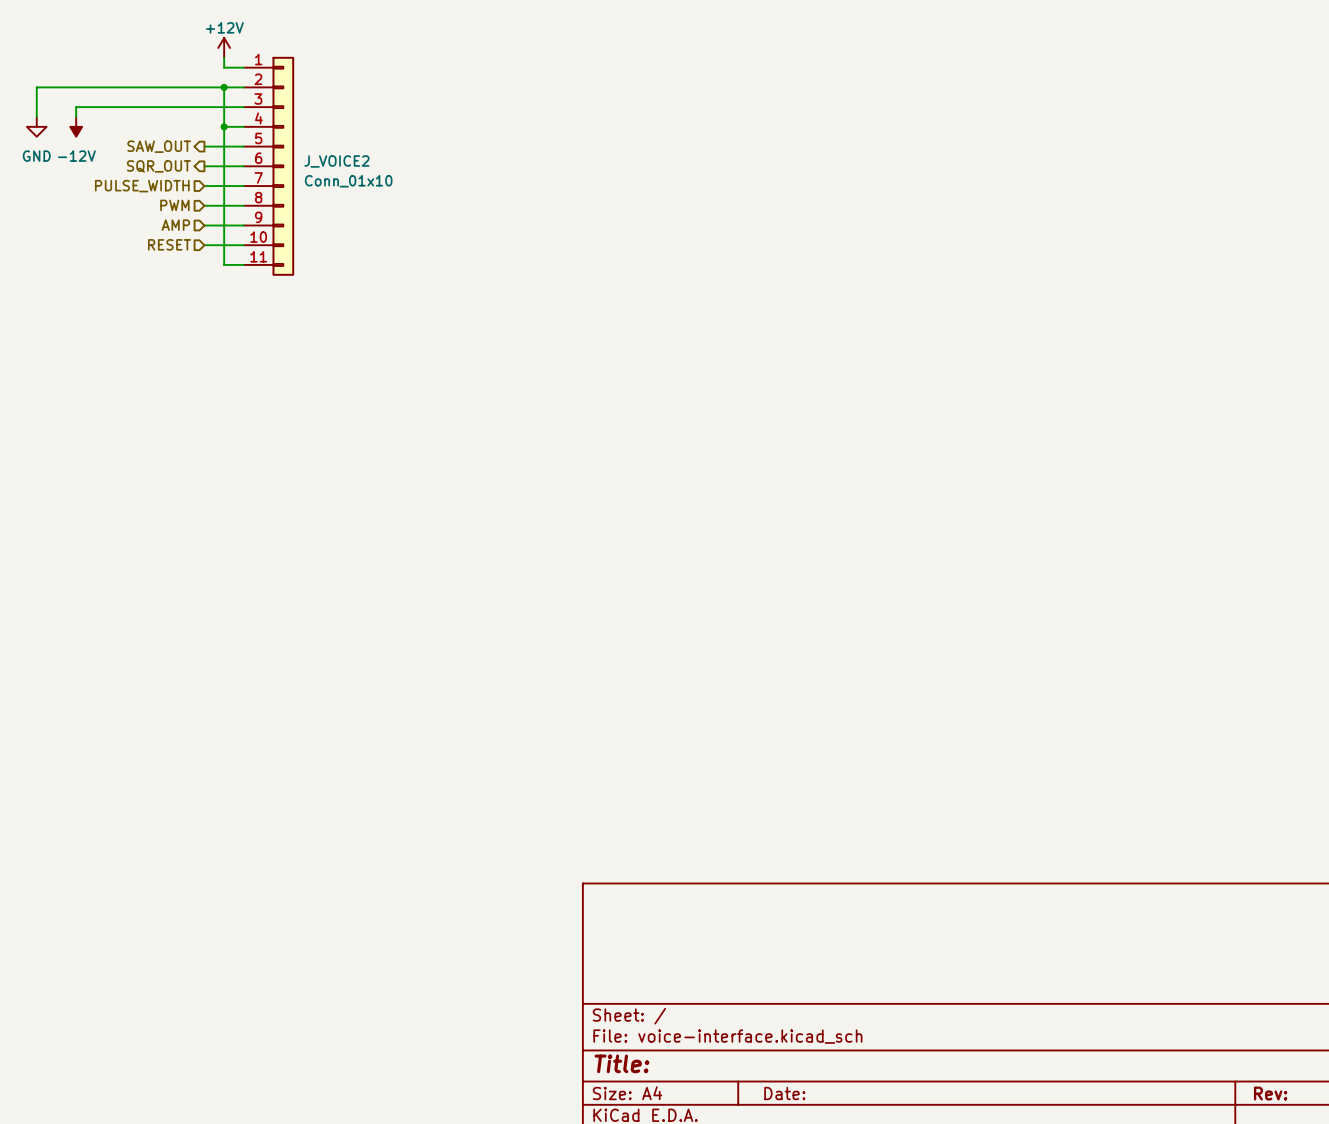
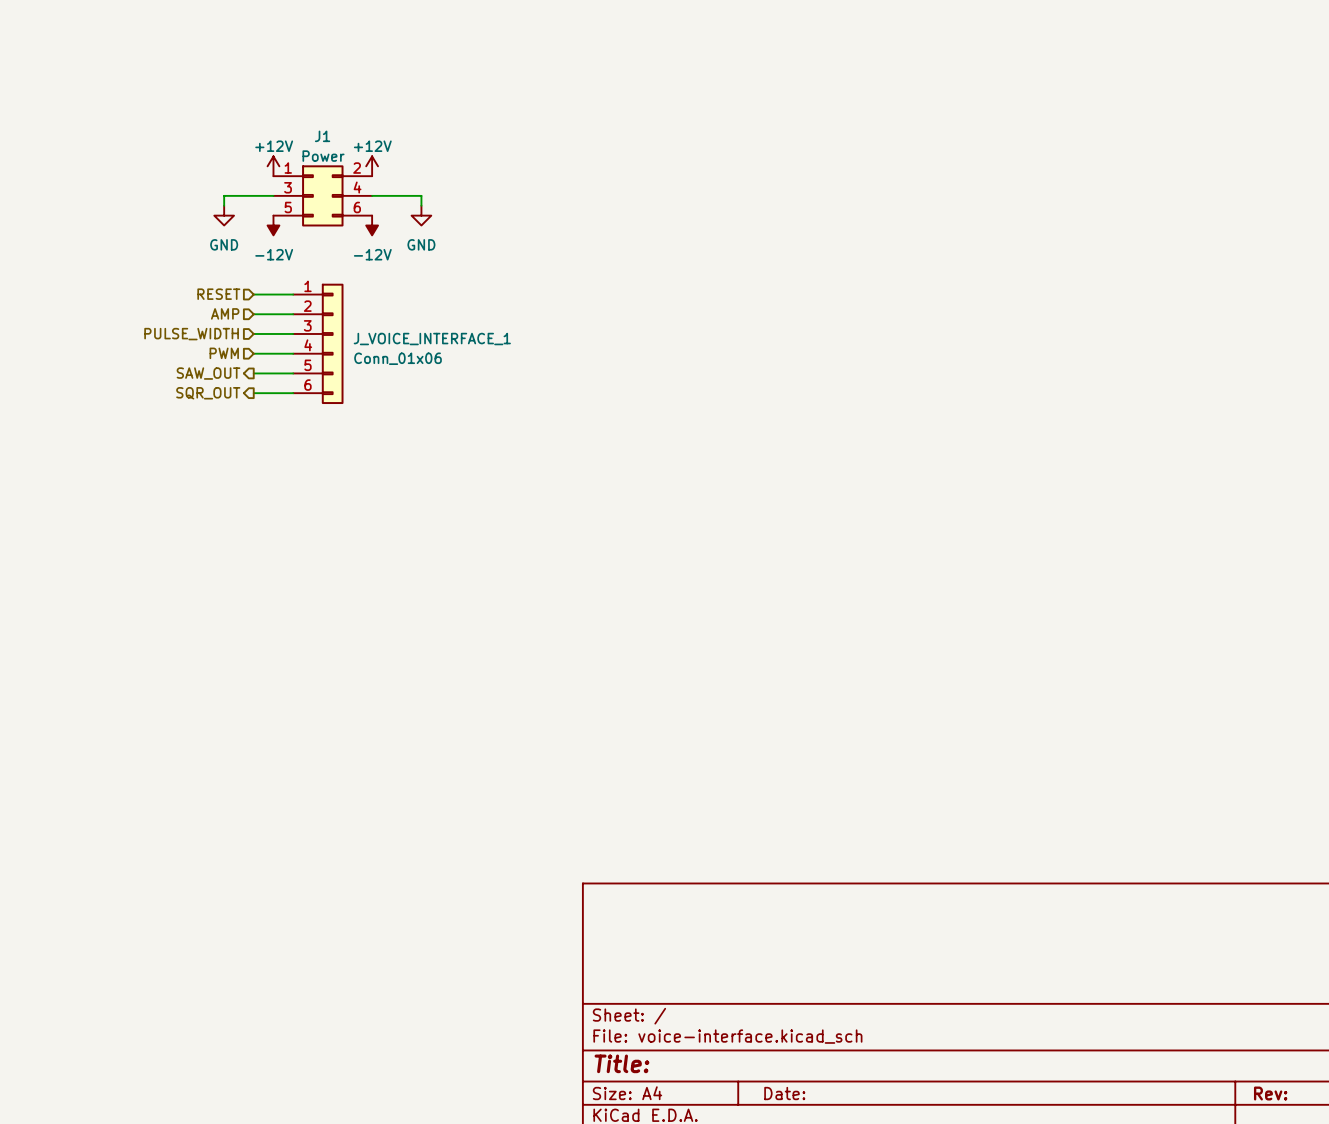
power symbol: +12V (224, 47) -> none
wire: (224, 57) (224, 67) (243, 67) -> none
wire: (224, 87) (224, 195) -> (273, 195) (224, 195)
junction: (224, 87) -> none
wire: (243, 87) (36, 87) (36, 116) -> none
wire: (243, 107) (76, 107) (76, 116) -> none
power symbol: GND (36, 126) -> none
power symbol: -12V (76, 126) -> none
wire: (224, 126) (243, 126) -> none
junction: (224, 126) -> none
hierarchical label: SAW_OUT (159, 146) -> none
wire: (204, 146) (243, 146) -> (253, 294) (293, 294)
hierarchical label: SQR_OUT (158, 166) -> none
wire: (204, 166) (243, 166) -> (253, 314) (293, 314)
J_VOICE2: Conn_01x10 (269, 166) -> none
power symbol: none -> +12V (273, 166)
power symbol: none -> +12V (372, 166)
hierarchical label position: PULSE_WIDTH (142, 186) -> PULSE_WIDTH (191, 334)
wire: (204, 186) (243, 186) -> (253, 333) (293, 333)
J1: none -> Power (322, 195)
wire: none -> (372, 195) (421, 195) (421, 205)
hierarchical label position: PWM (174, 205) -> PWM (224, 353)
wire: (204, 205) (243, 205) -> (253, 353) (293, 353)
wire: (224, 205) (224, 264) (243, 264) -> none
power symbol: none -> GND (224, 215)
power symbol: none -> GND (421, 215)
hierarchical label position: AMP (175, 225) -> AMP (225, 313)
wire: (204, 225) (243, 225) -> (253, 373) (293, 373)
power symbol: none -> -12V (273, 225)
power symbol: none -> -12V (372, 225)
hierarchical label position: RESET (169, 244) -> RESET (218, 294)
wire: (204, 245) (243, 245) -> (253, 393) (293, 393)
J_VOICE_INTERFACE_1: none -> Conn_01x06 (318, 343)
hierarchical label: none -> SAW_OUT (208, 373)
hierarchical label: none -> SQR_OUT (208, 393)

